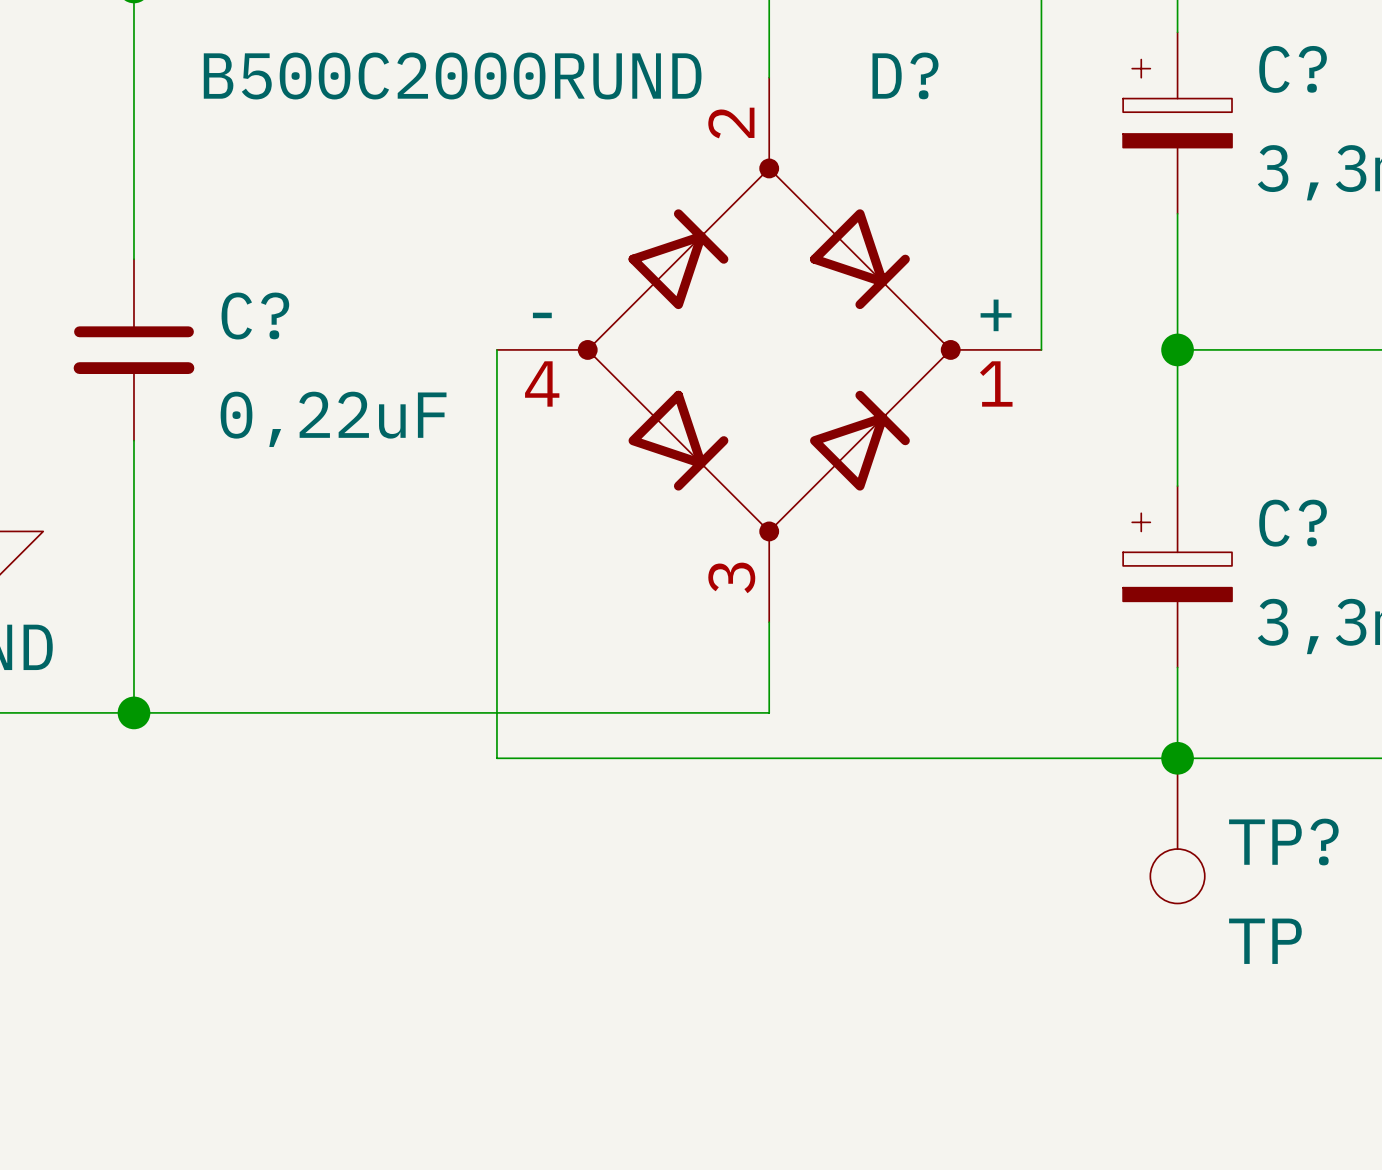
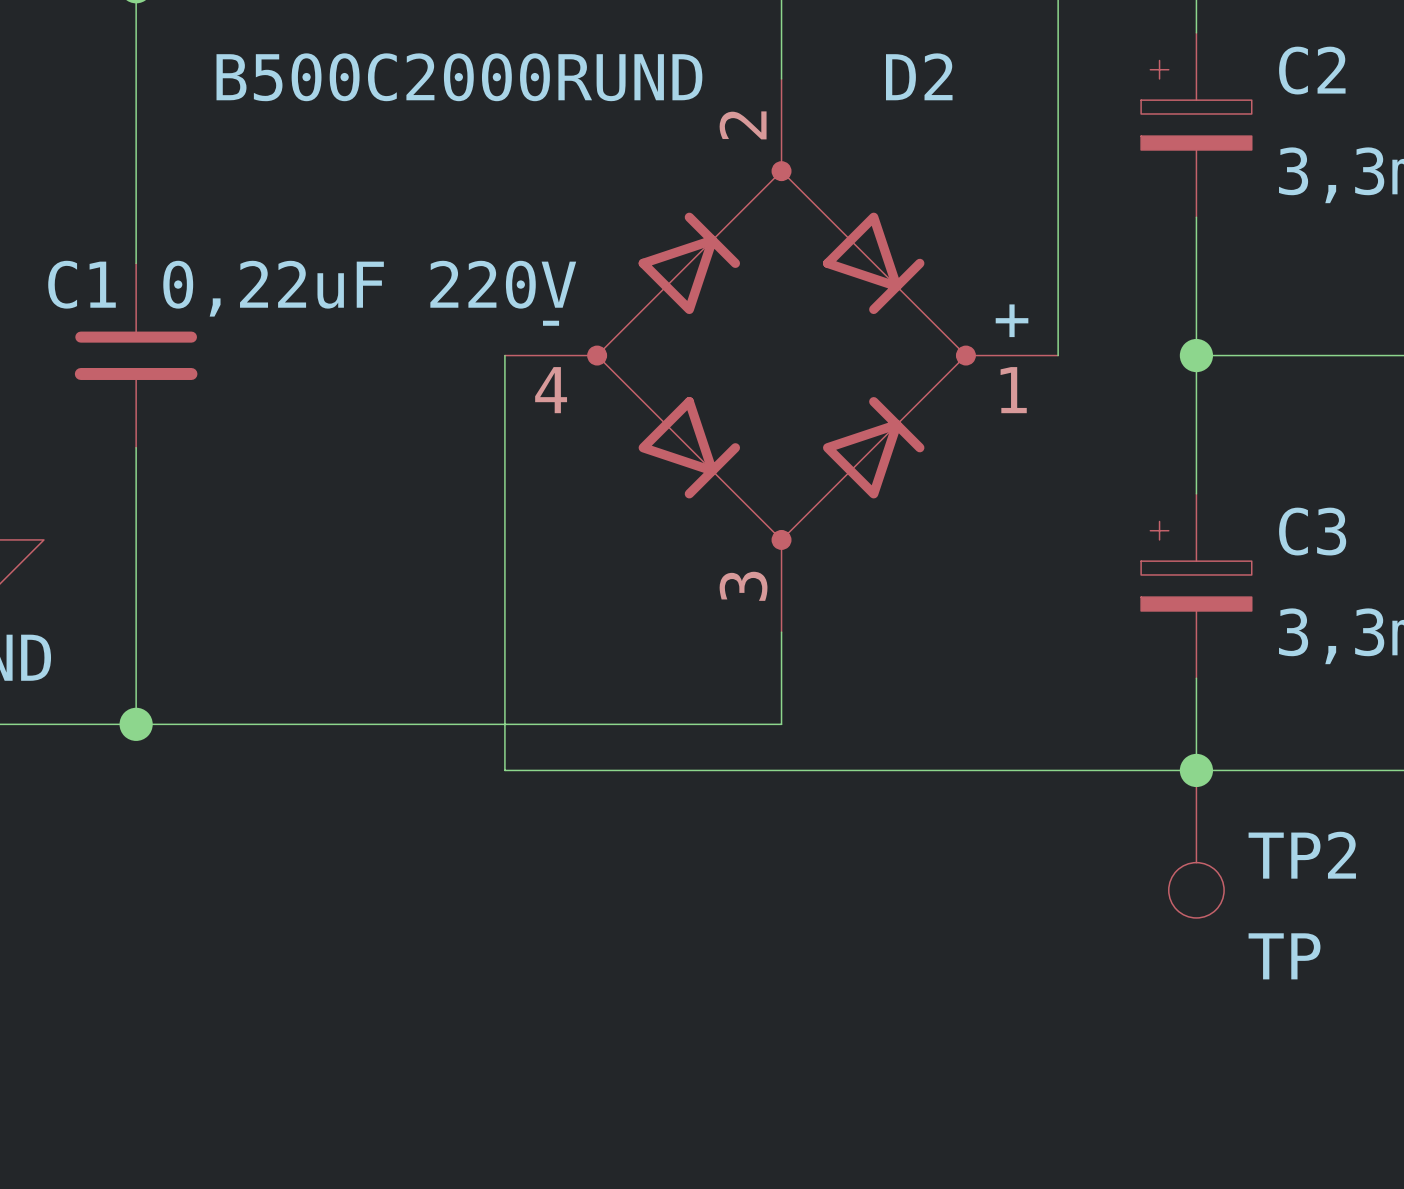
C? name: C? (1293, 69) -> C2 (1312, 70)
D? name: D? (905, 75) -> D2 (919, 76)
C? name: C? (255, 316) -> C1 (82, 284)
C? value: 0,22uF (333, 419) -> 0,22uF 220V (369, 288)
C? name: C? (1293, 523) -> C3 (1312, 531)
TP? name: TP? (1283, 842) -> TP2 (1302, 855)

